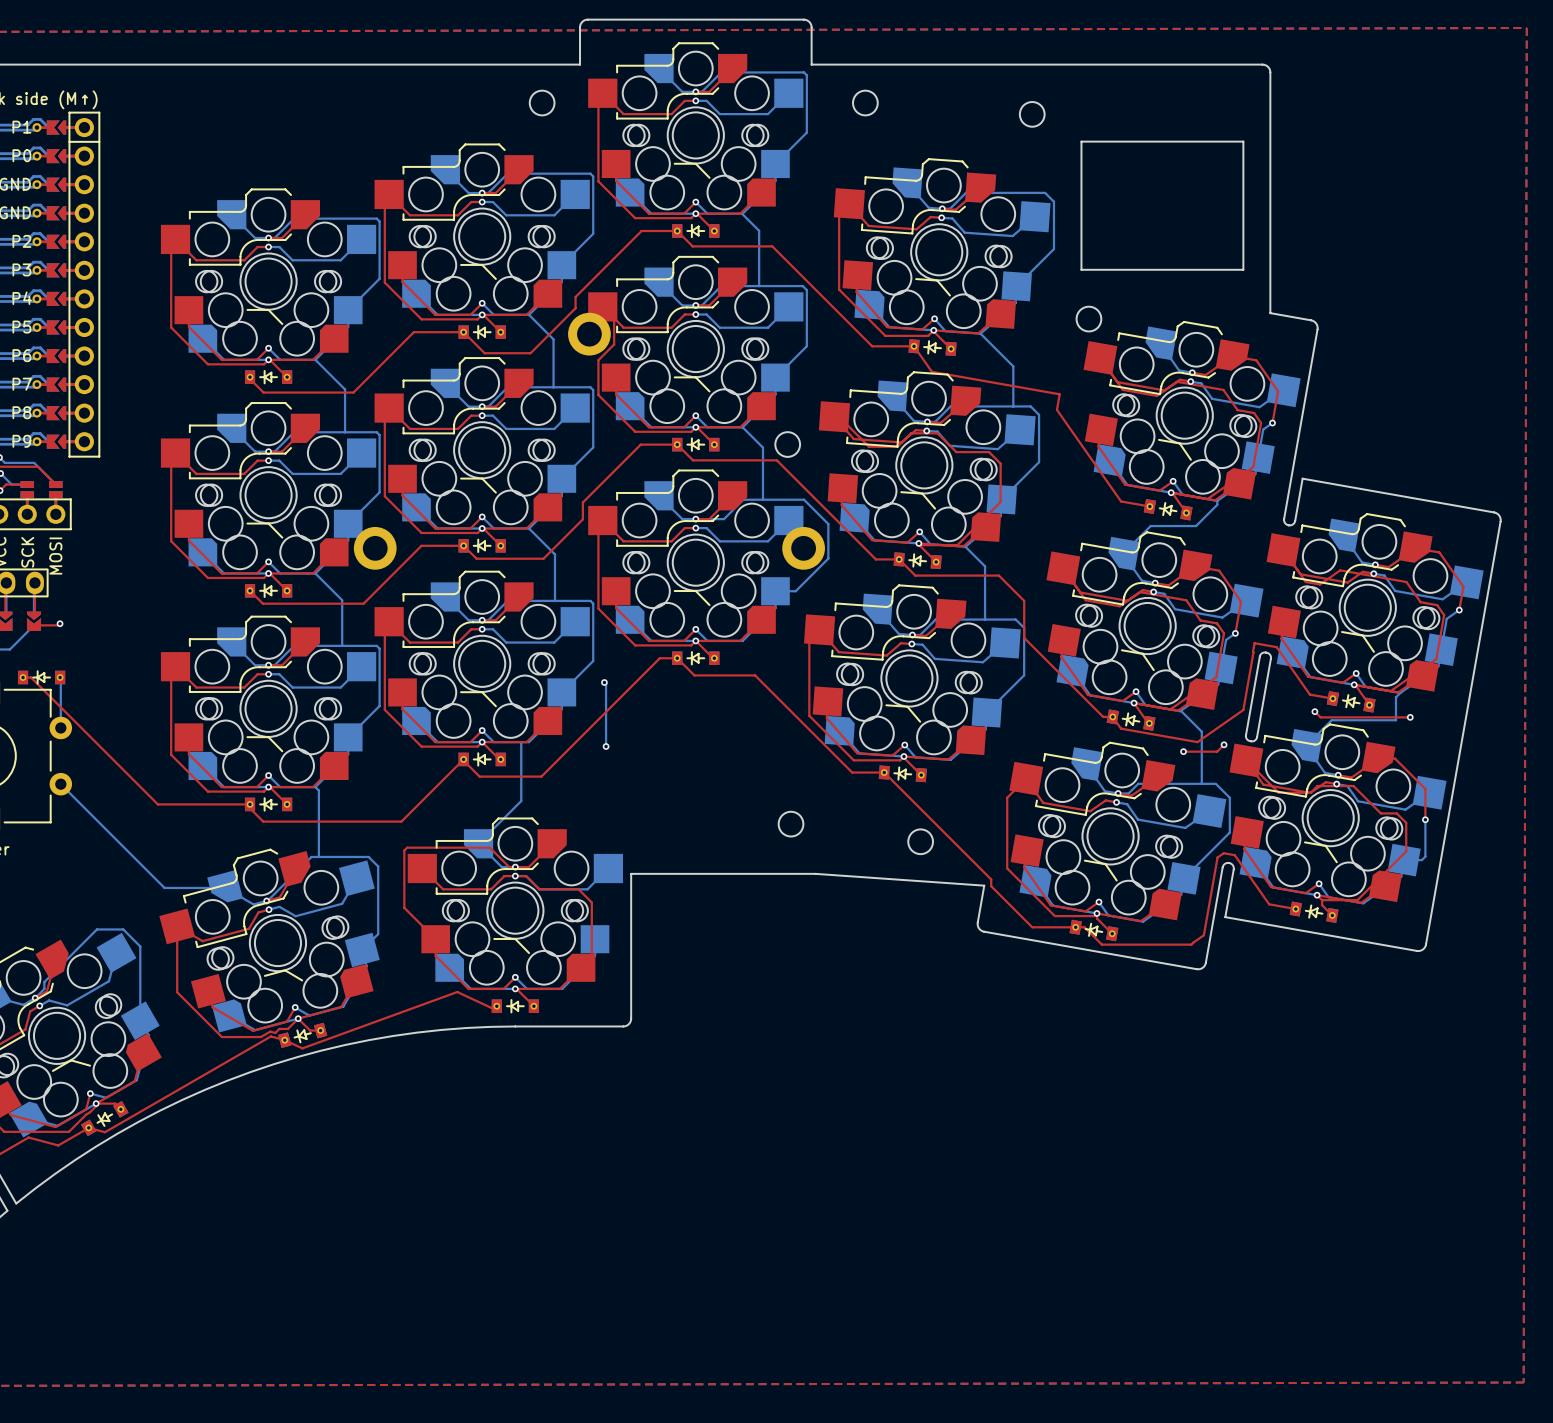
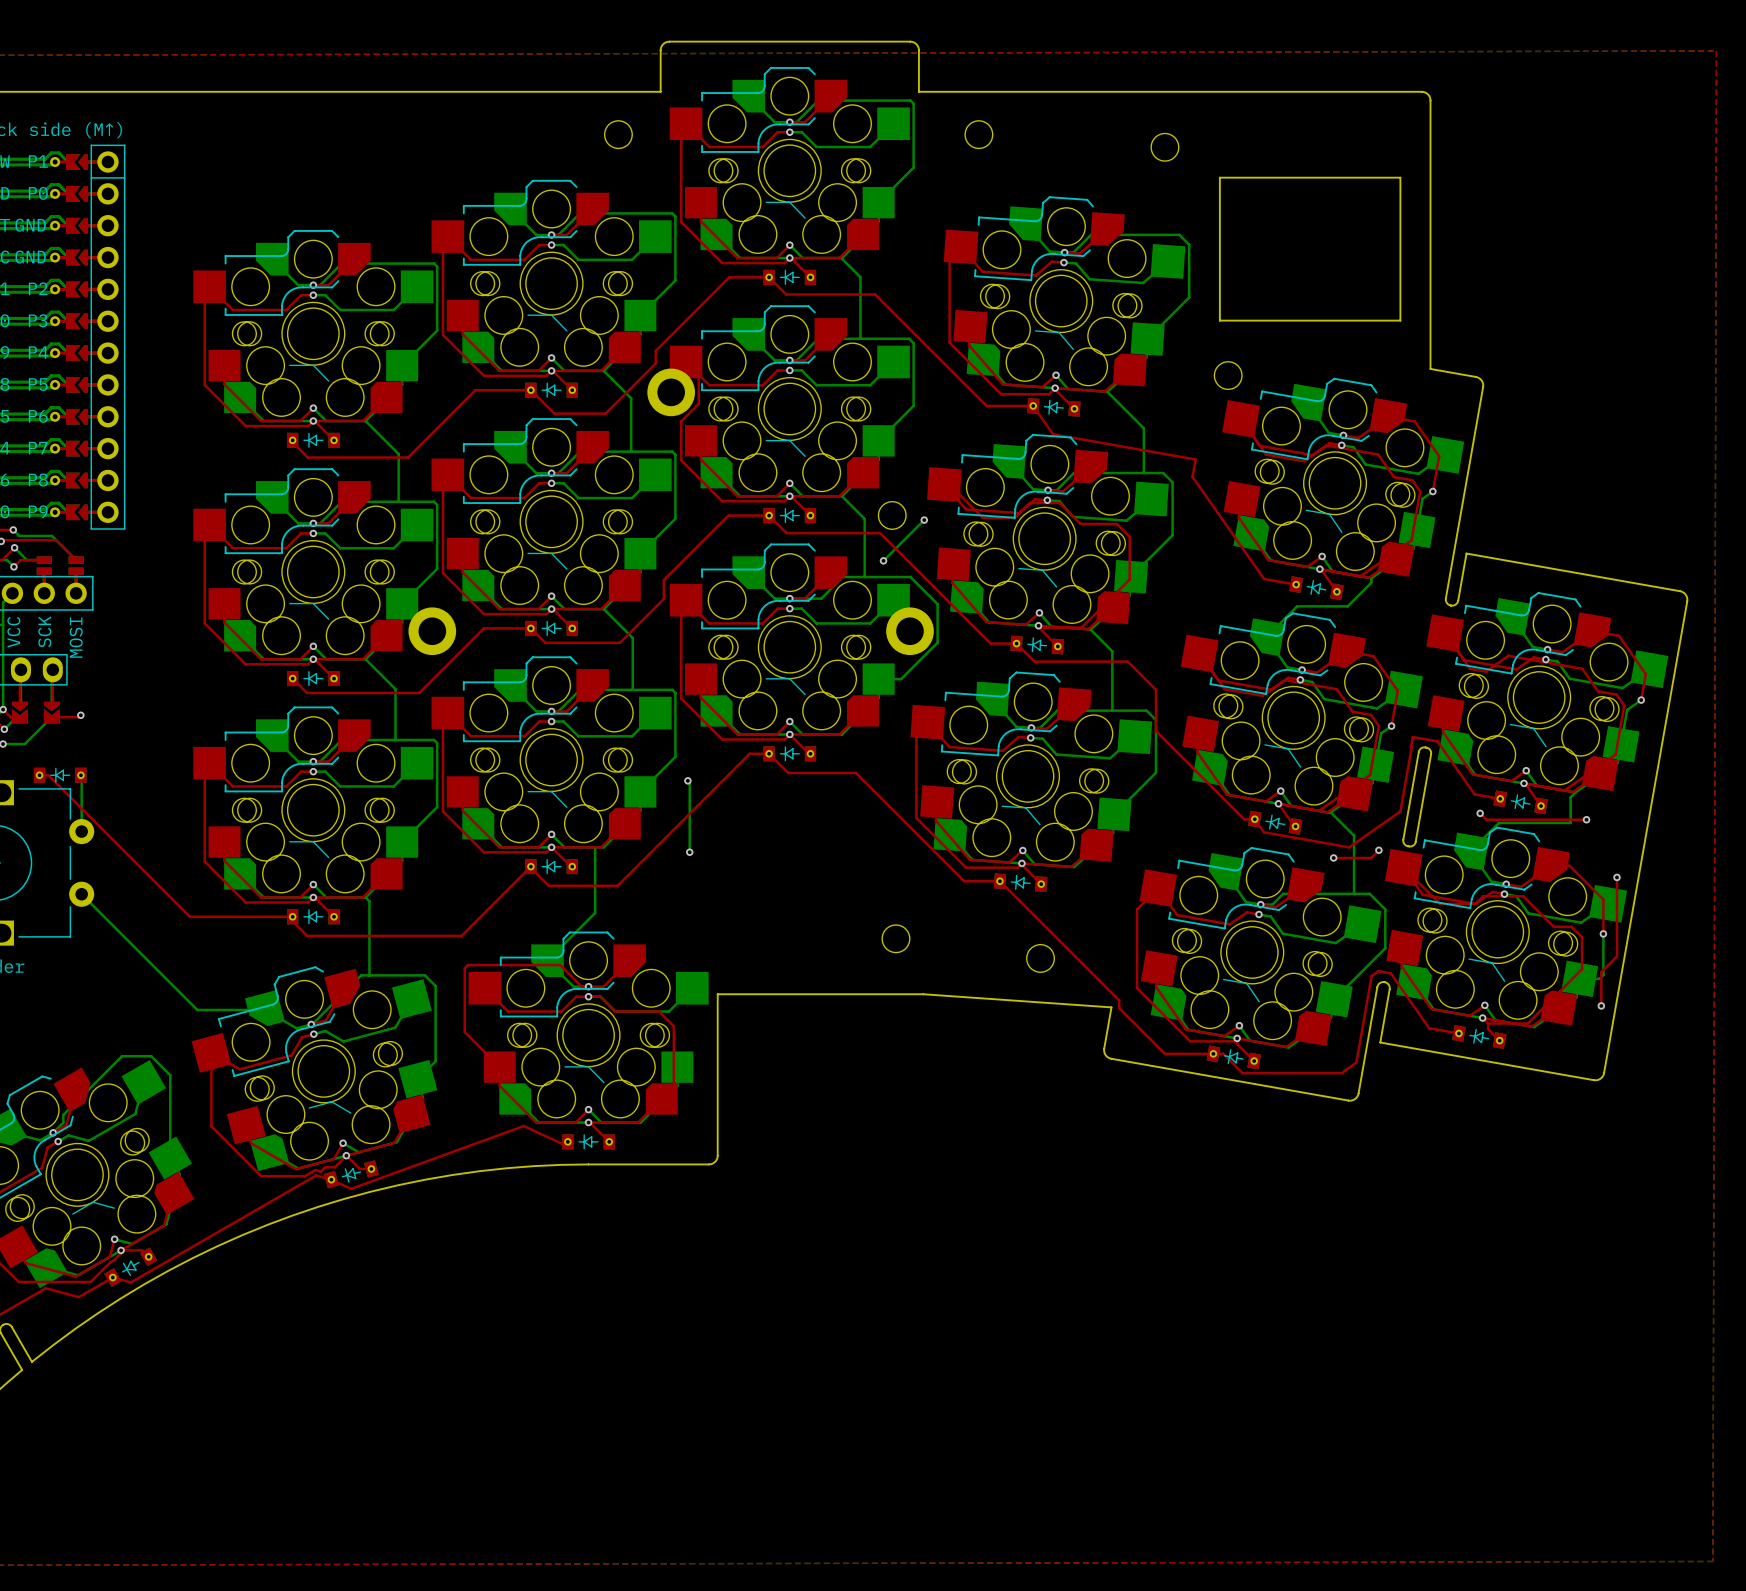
bottom track: none -> (924, 520) (883, 560)
via: none -> (924, 520)
via: none -> (883, 560)
top track: none -> (1617, 877) (1617, 956) (1601, 972) (1601, 1005)
via: none -> (1617, 877)
via: none -> (1601, 1005)

